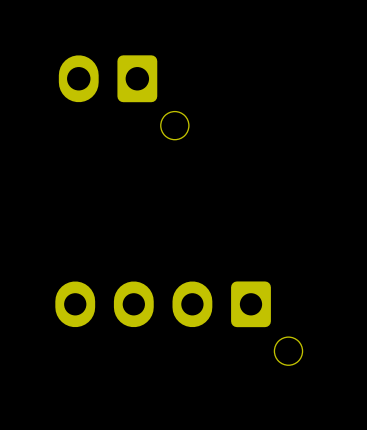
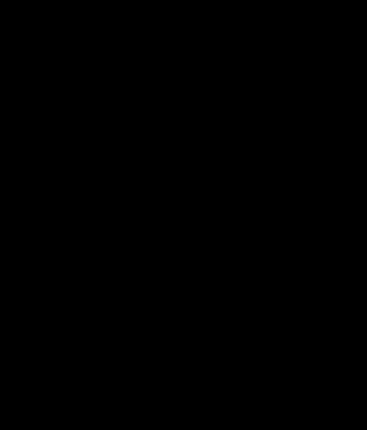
part: (123, 97) -> none
part: (178, 323) -> none

